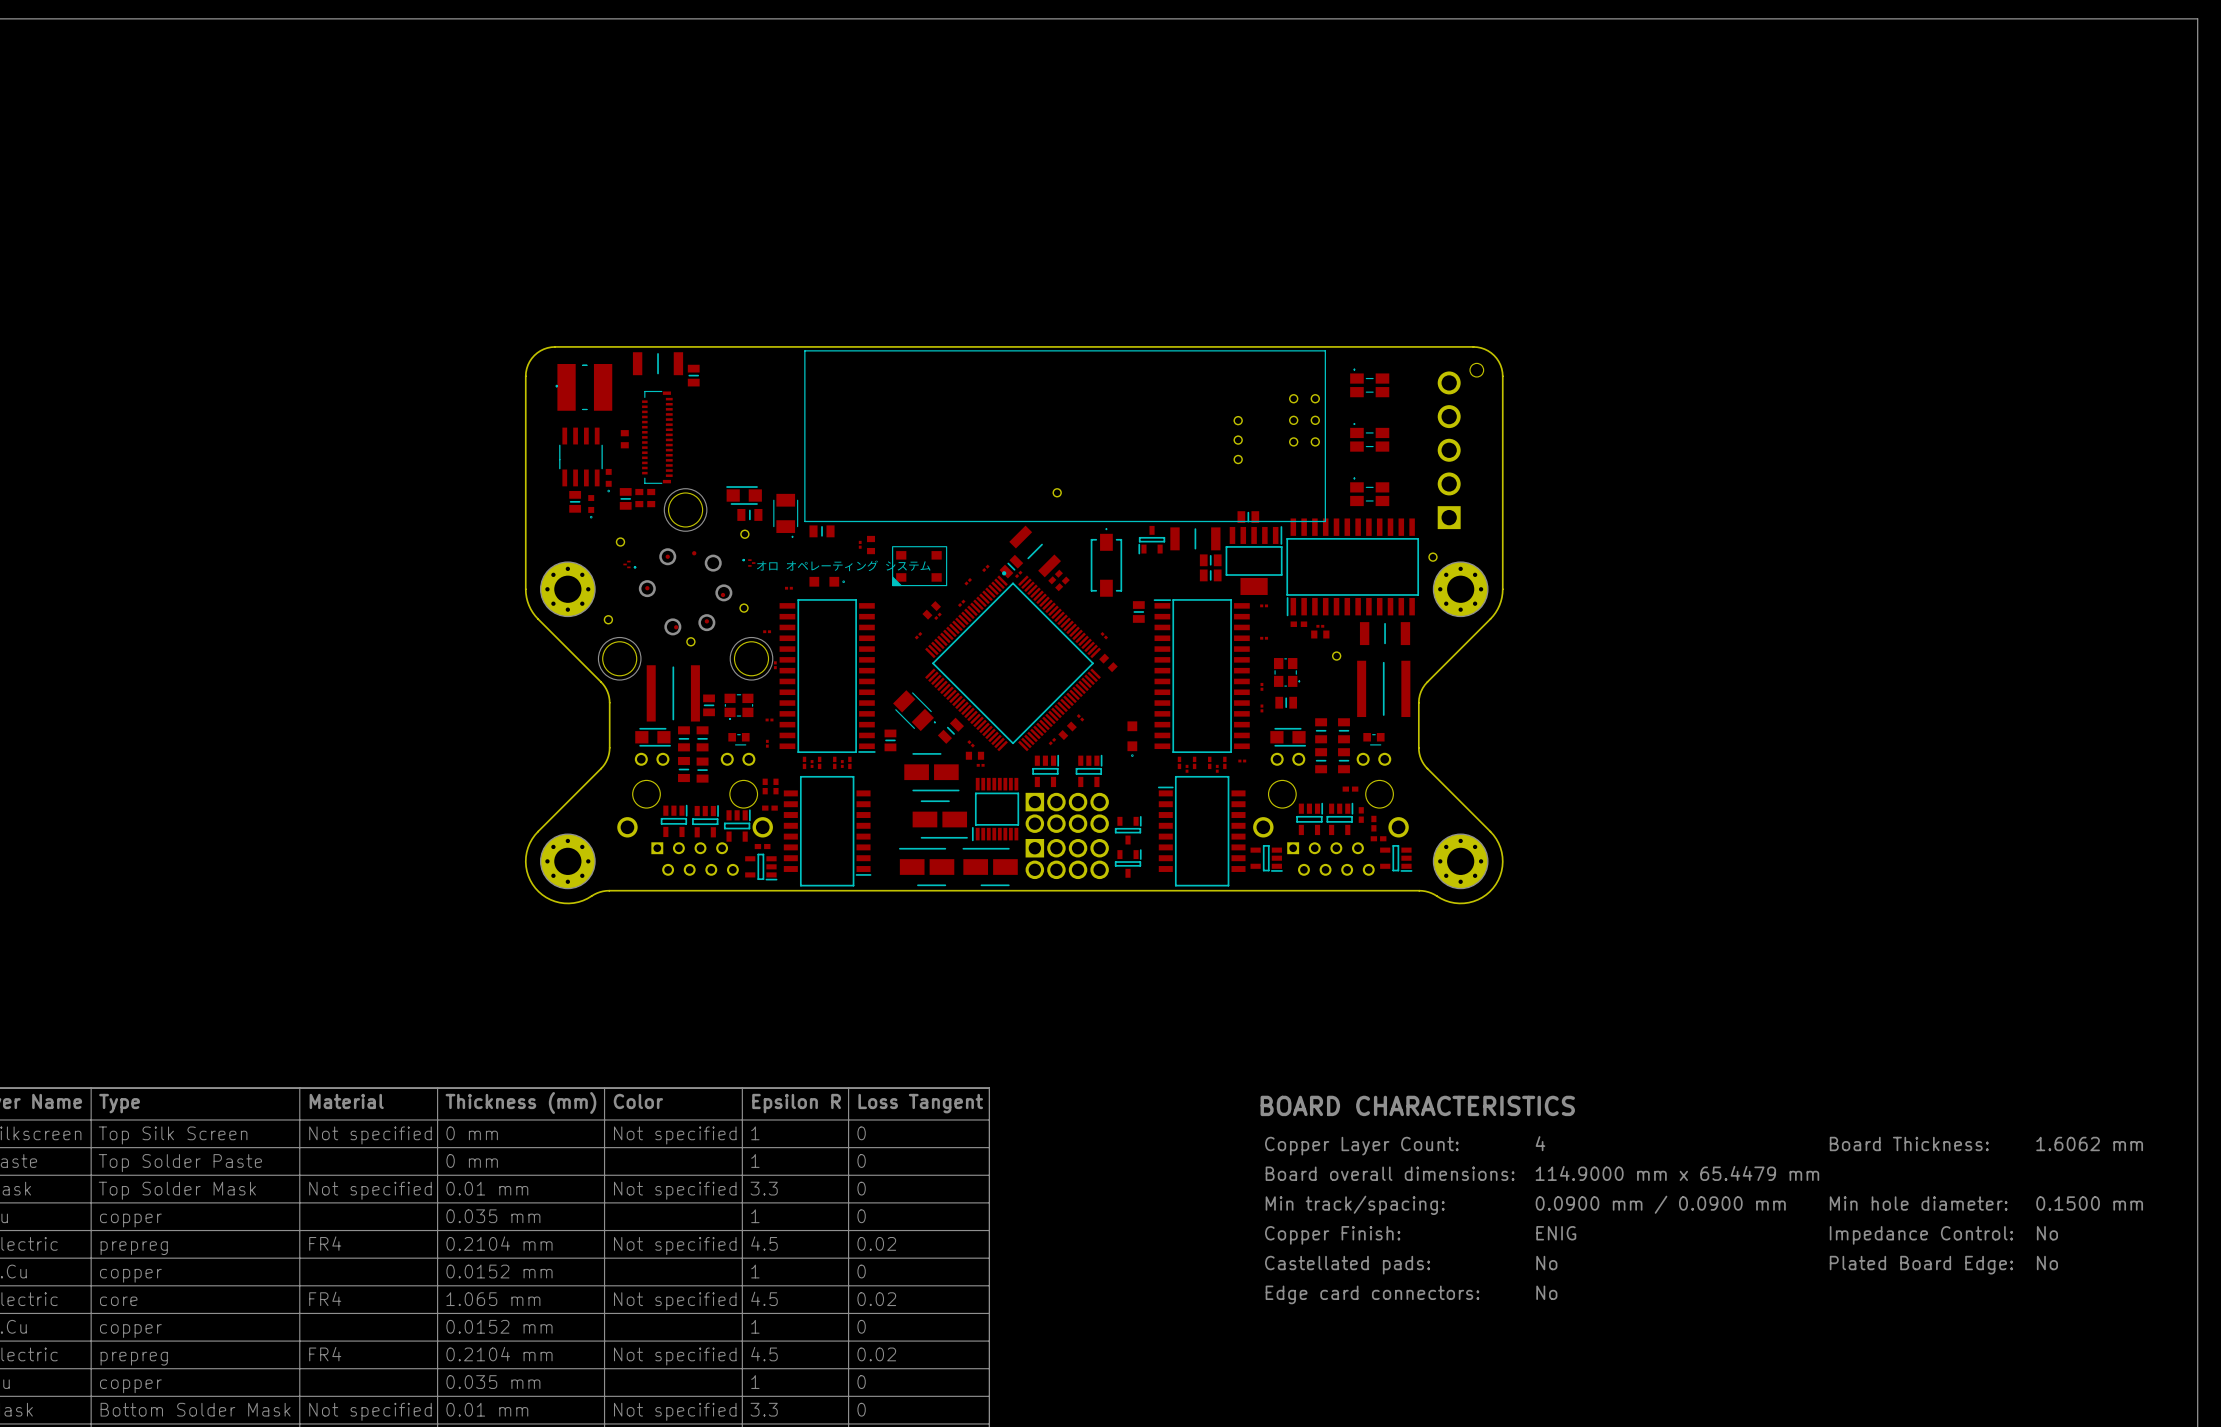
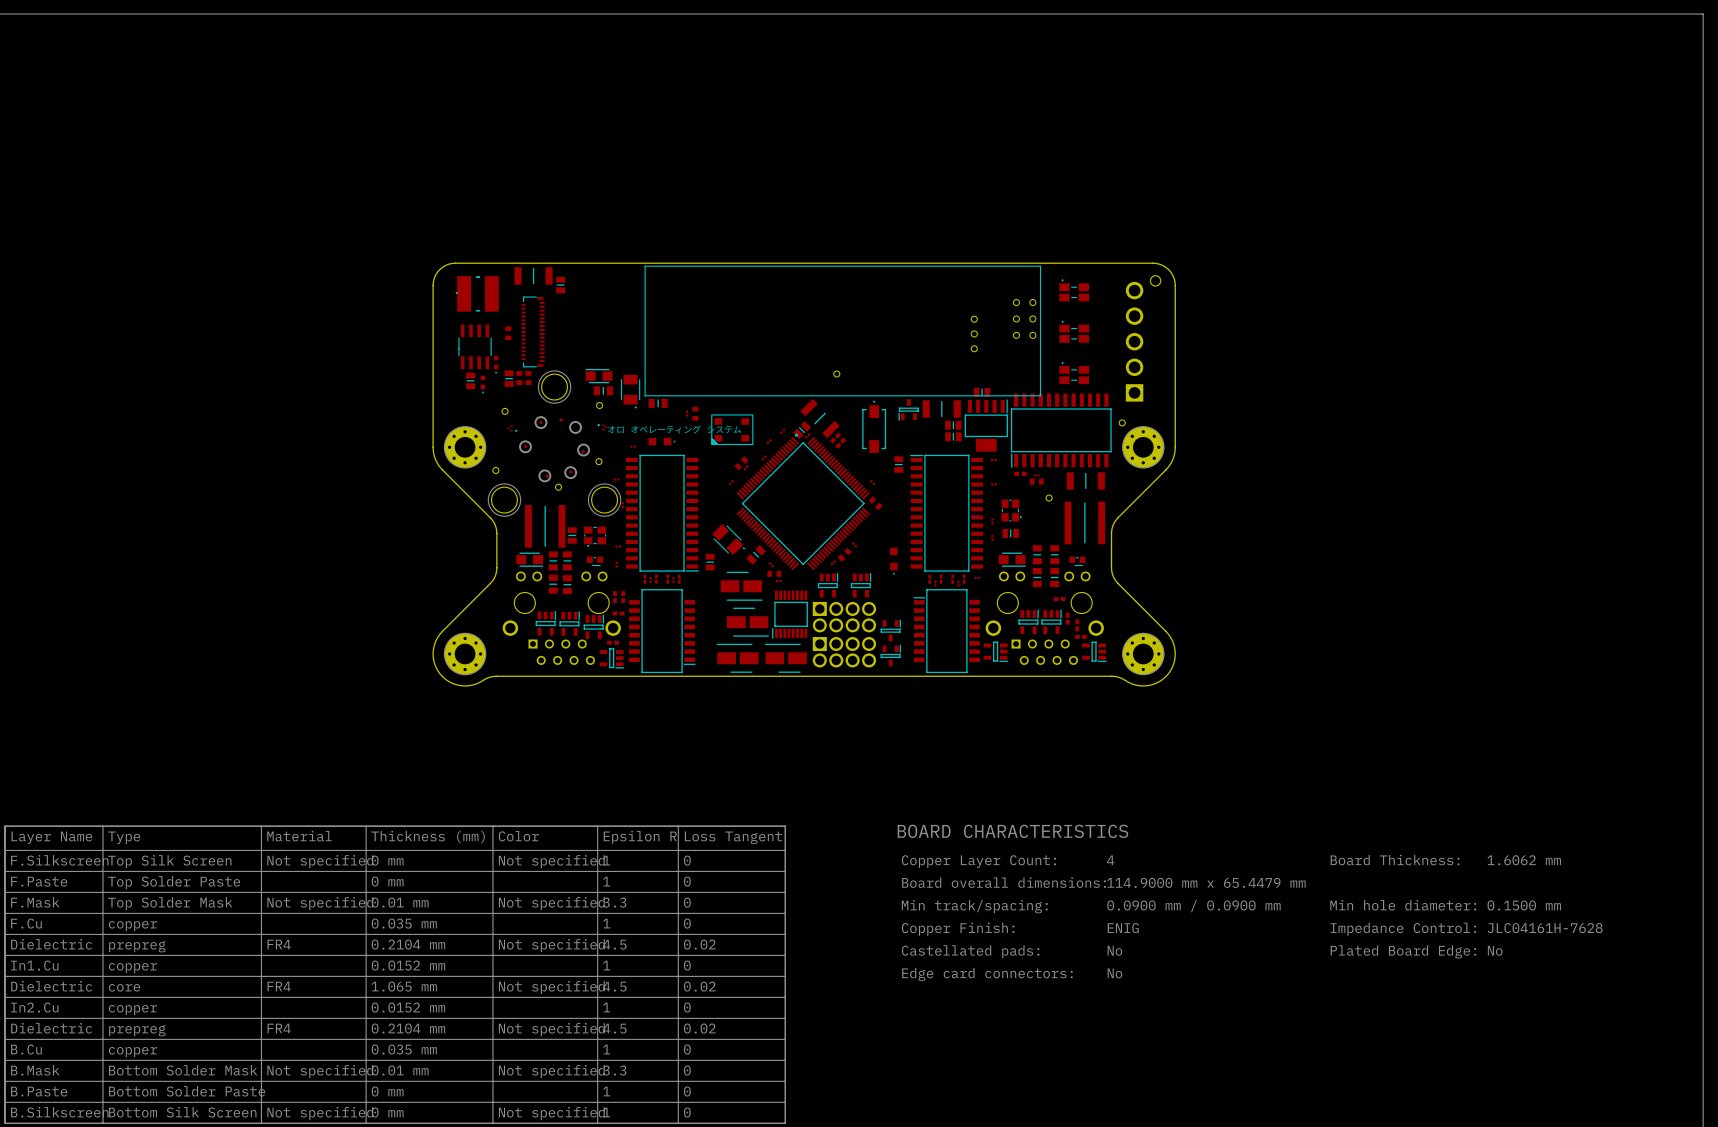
text position: BOARD CHARACTERISTICS (1417, 1105) -> BOARD CHARACTERISTICS (1012, 831)
text position: 4 (1540, 1143) -> 4 (1110, 860)
text position: Board Thickness: (1909, 1143) -> Board Thickness: (1395, 860)
text position: 1.6062 mm (2089, 1143) -> 1.6062 mm (1524, 860)
text position: Copper Layer Count: (1361, 1146) -> Copper Layer Count: (978, 861)
text position: Board overall dimensions: (1390, 1173) -> Board overall dimensions: (1004, 882)
text position: 114.9000 mm x 65.4479 mm (1677, 1173) -> 114.9000 mm x 65.4479 mm (1206, 882)
text position: Min hole diameter: (1918, 1203) -> Min hole diameter: (1403, 905)
text position: 0.1500 mm (2089, 1203) -> 0.1500 mm (1524, 905)
text position: 0.0900 mm / 0.0900 mm (1660, 1204) -> 0.0900 mm / 0.0900 mm (1193, 906)
text position: Min track/spacing: (1355, 1205) -> Min track/spacing: (974, 906)
text: none -> JLC04161H-7628 (1545, 928)
text position: ENIG (1556, 1233) -> ENIG (1123, 928)
text: No (2047, 1233) -> none
text position: Copper Finish: (1332, 1235) -> Copper Finish: (958, 929)
text position: Impedance Control: (1921, 1235) -> Impedance Control: (1403, 929)
text: none -> No (1114, 950)
text: none -> No (1495, 950)
text: No (1546, 1263) -> none
text: No (2047, 1263) -> none
text position: Castellated pads: (1347, 1265) -> Castellated pads: (970, 951)
text position: Plated Board Edge: (1921, 1265) -> Plated Board Edge: (1403, 951)
text: none -> No (1114, 973)
text: No (1546, 1292) -> none
text position: Edge card connectors: (1372, 1294) -> Edge card connectors: (987, 974)

